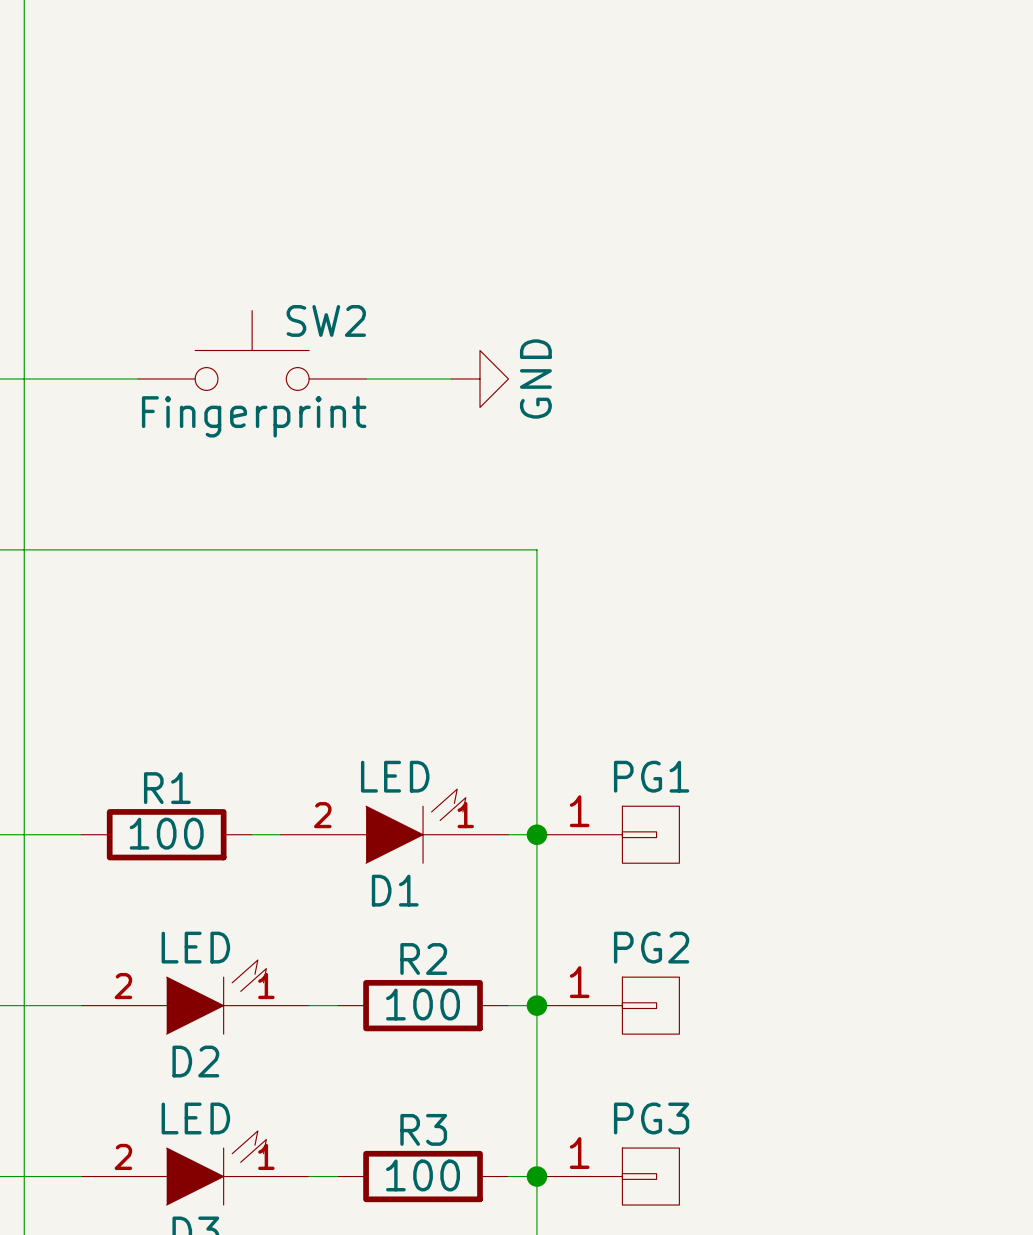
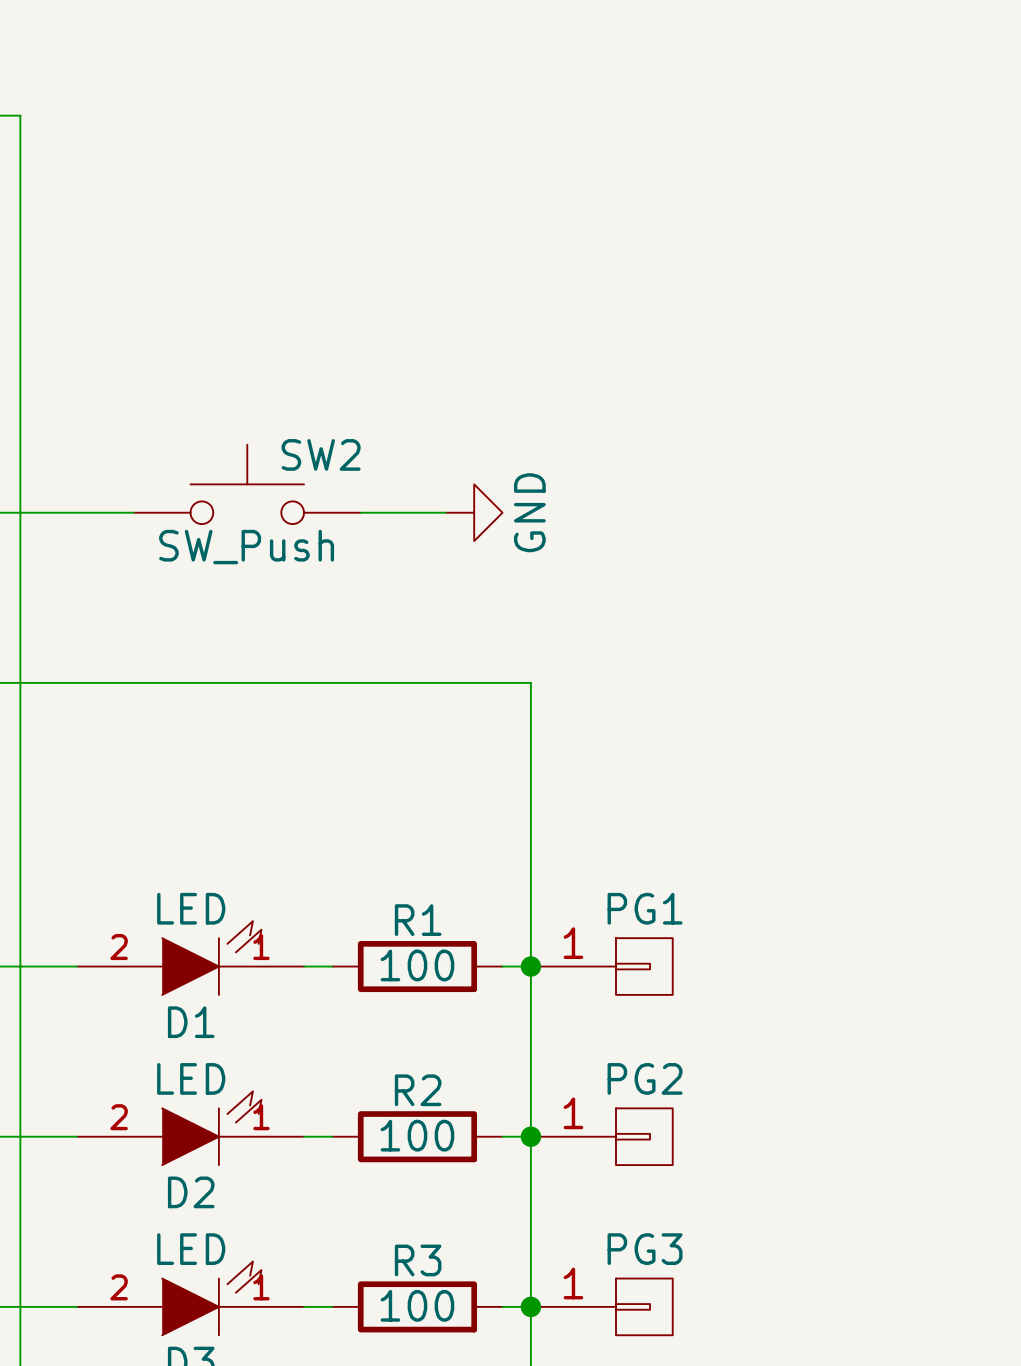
SW2 value: Fingerprint (254, 416) -> SW_Push (246, 547)
D1 position: (394, 826) -> (190, 958)
R1 position: (166, 834) -> (417, 966)

